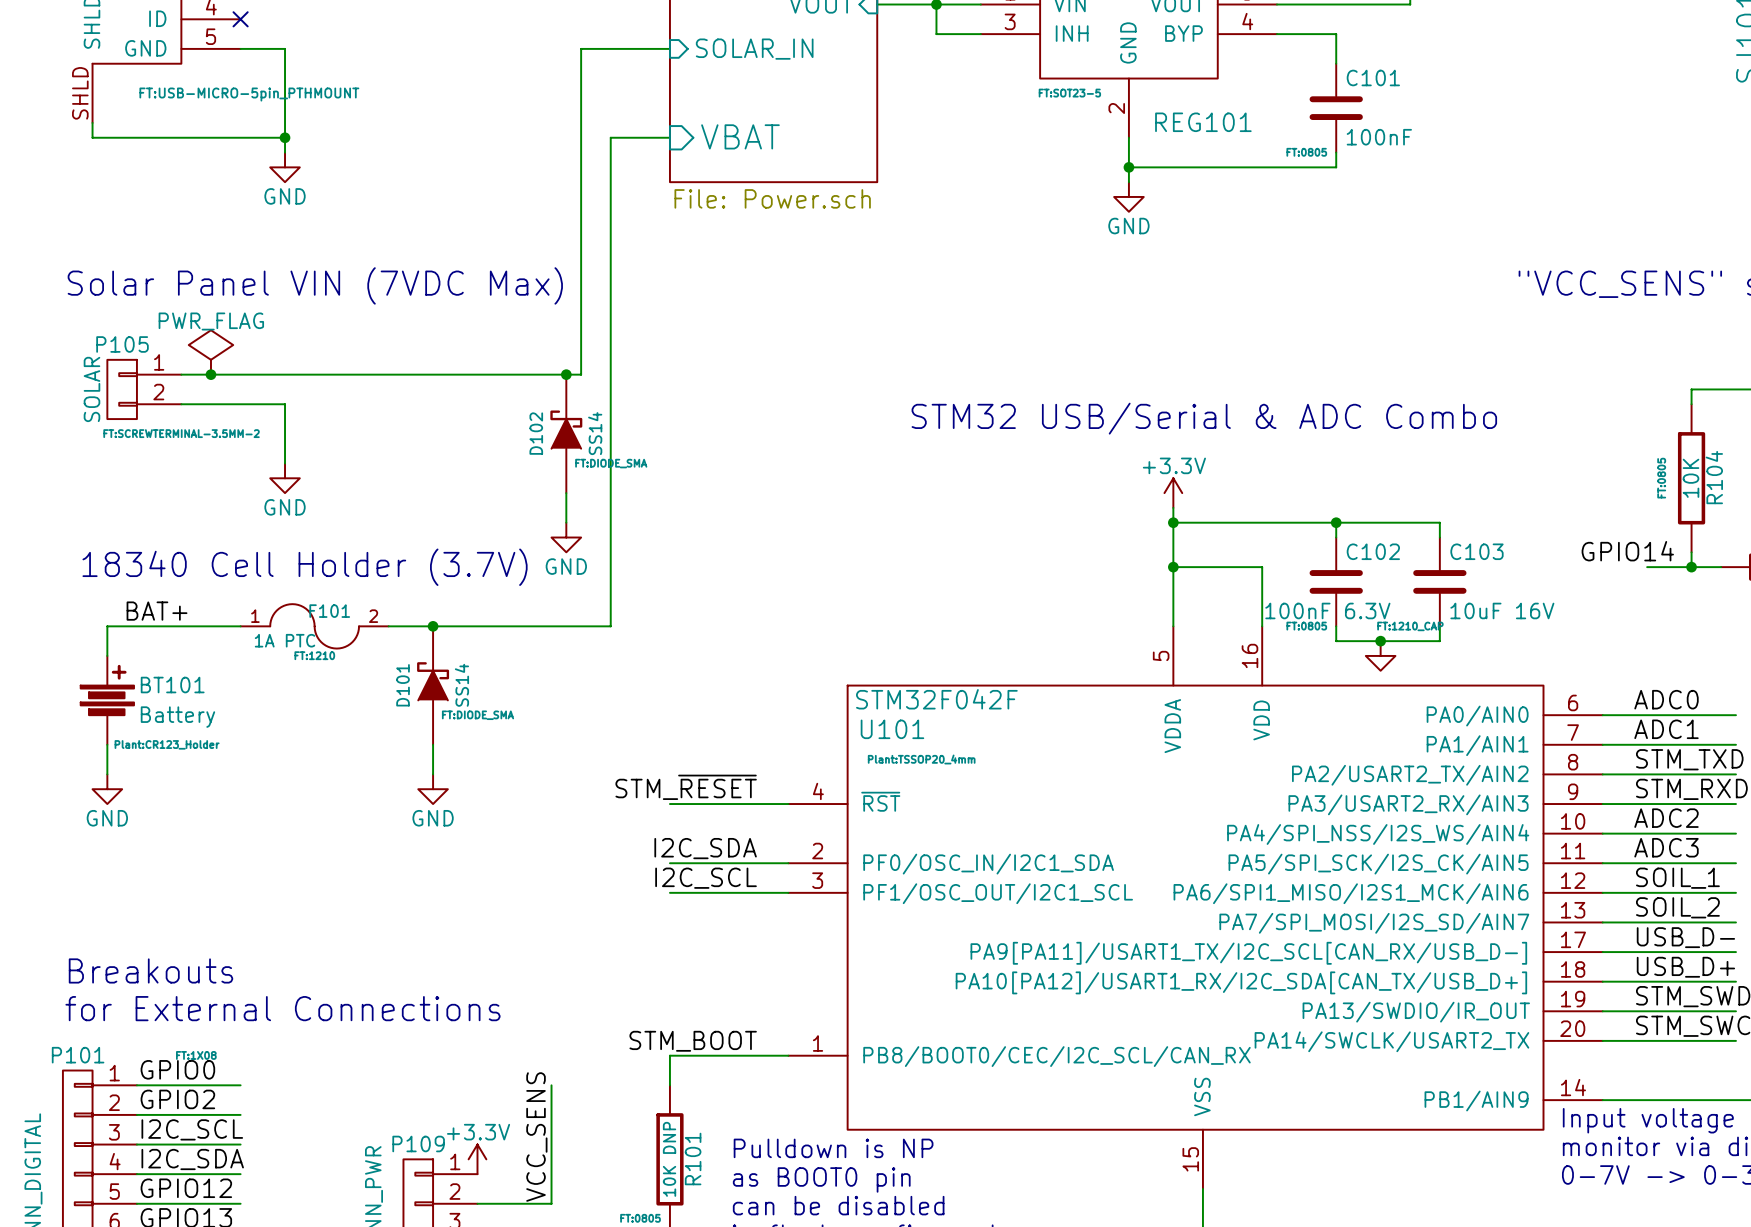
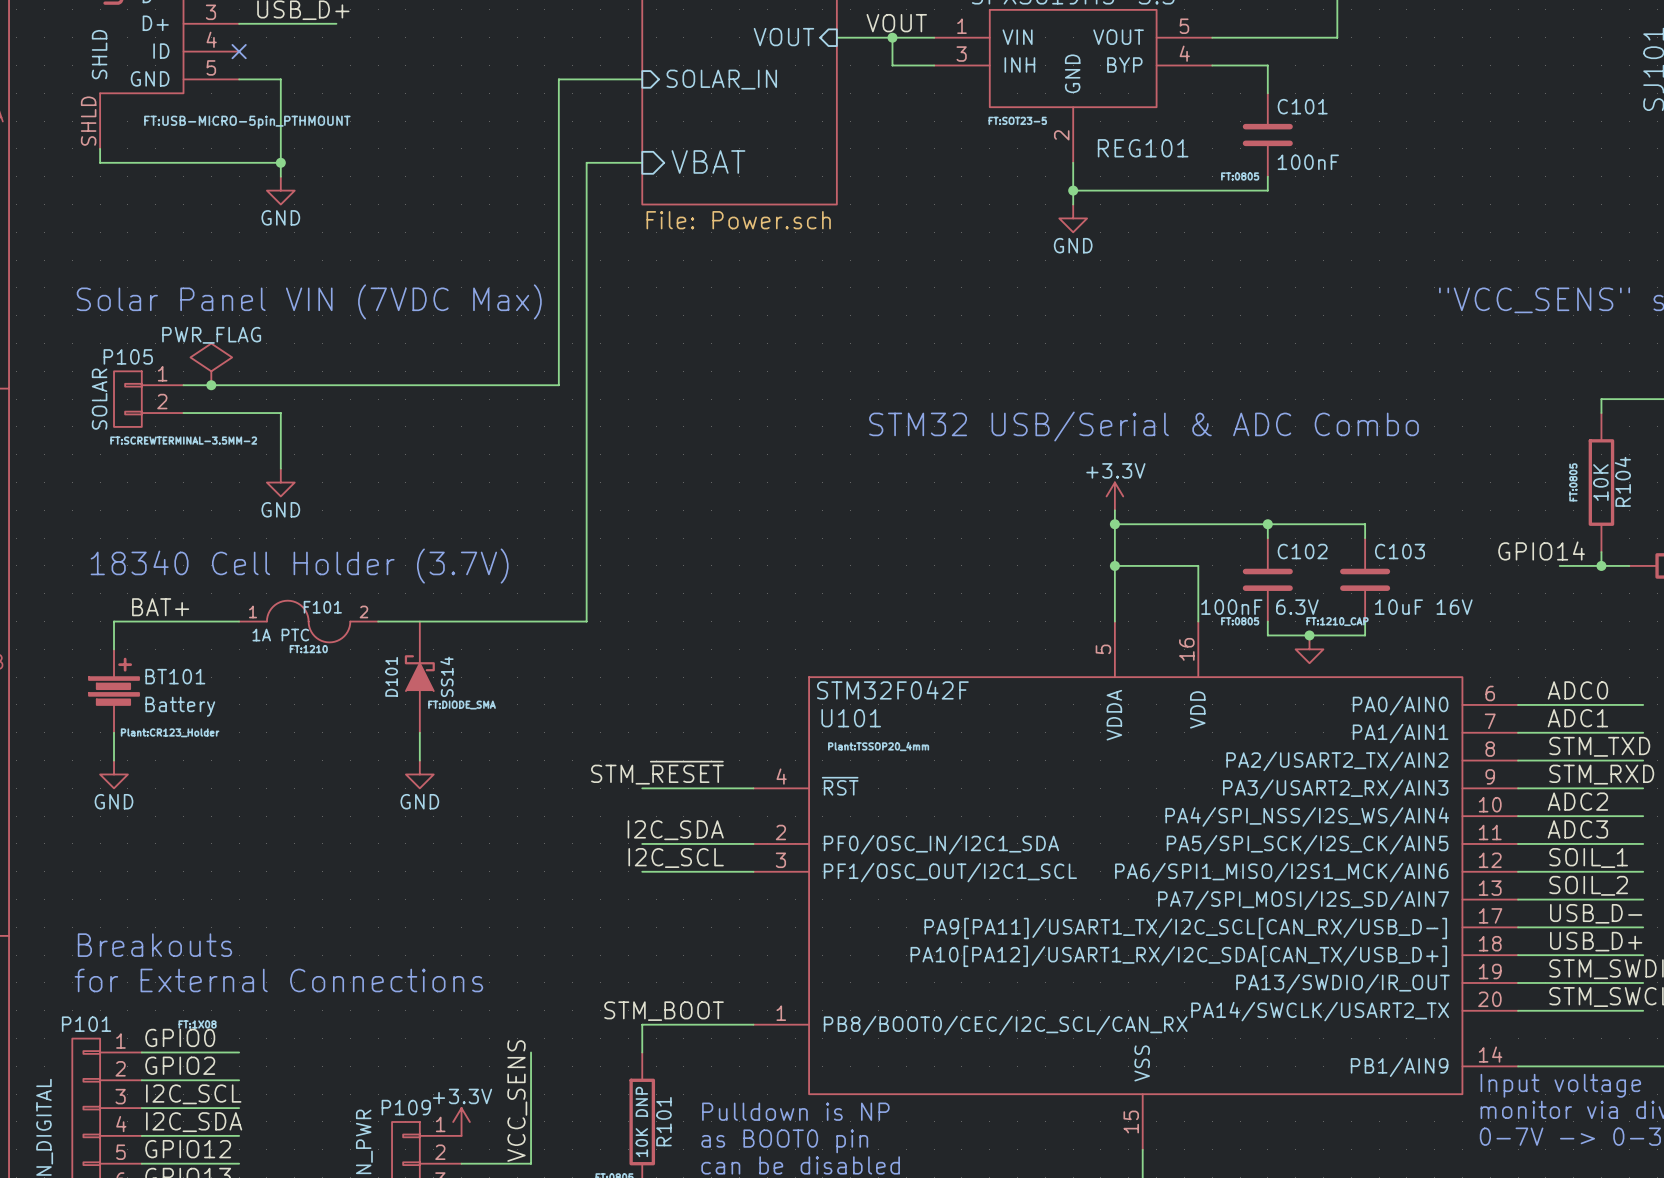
junction: (566, 374) -> none
D102: SS14 (566, 433) -> none
wire: (566, 493) (566, 522) -> none
power symbol: GND (566, 537) -> none
junction: (433, 626) -> none

